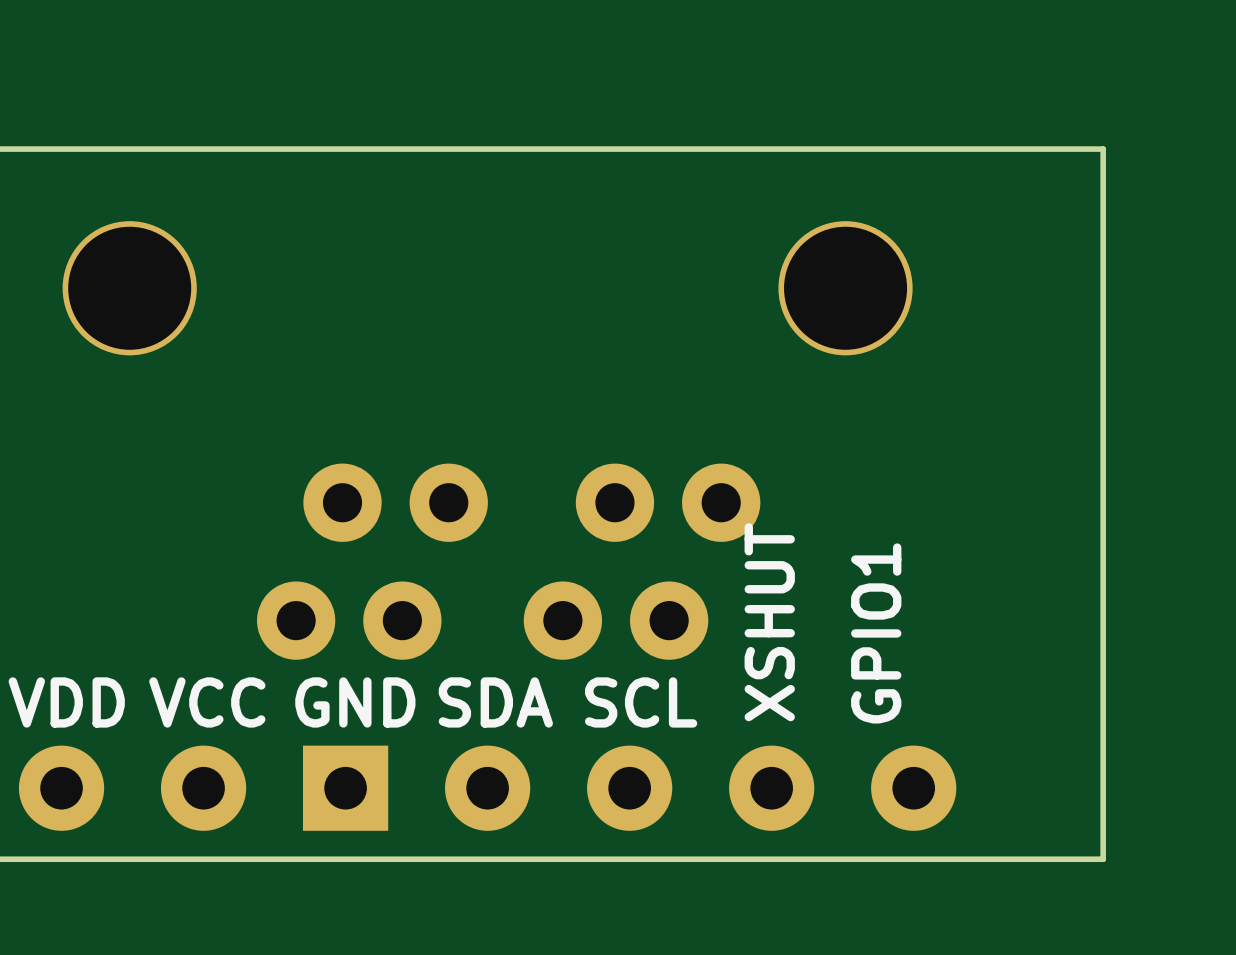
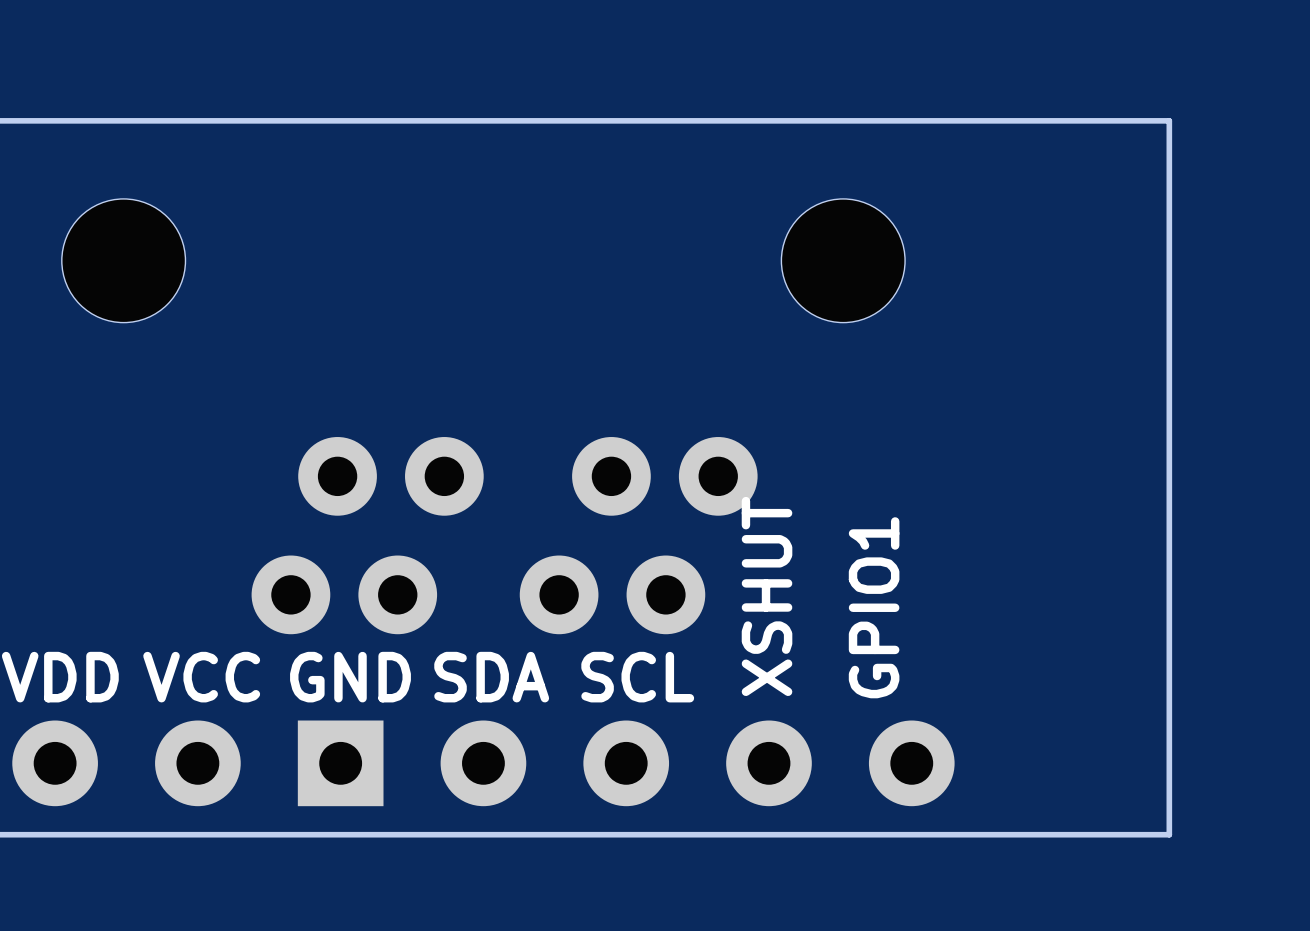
board edge: (1103, 149) (1103, 859) -> (1102, 120) (1169, 120) (1169, 834) (1102, 834)
part footprint: [62, 221, 197, 356] -> [61, 198, 186, 323]
part footprint: [778, 221, 913, 356] -> [781, 198, 906, 323]

